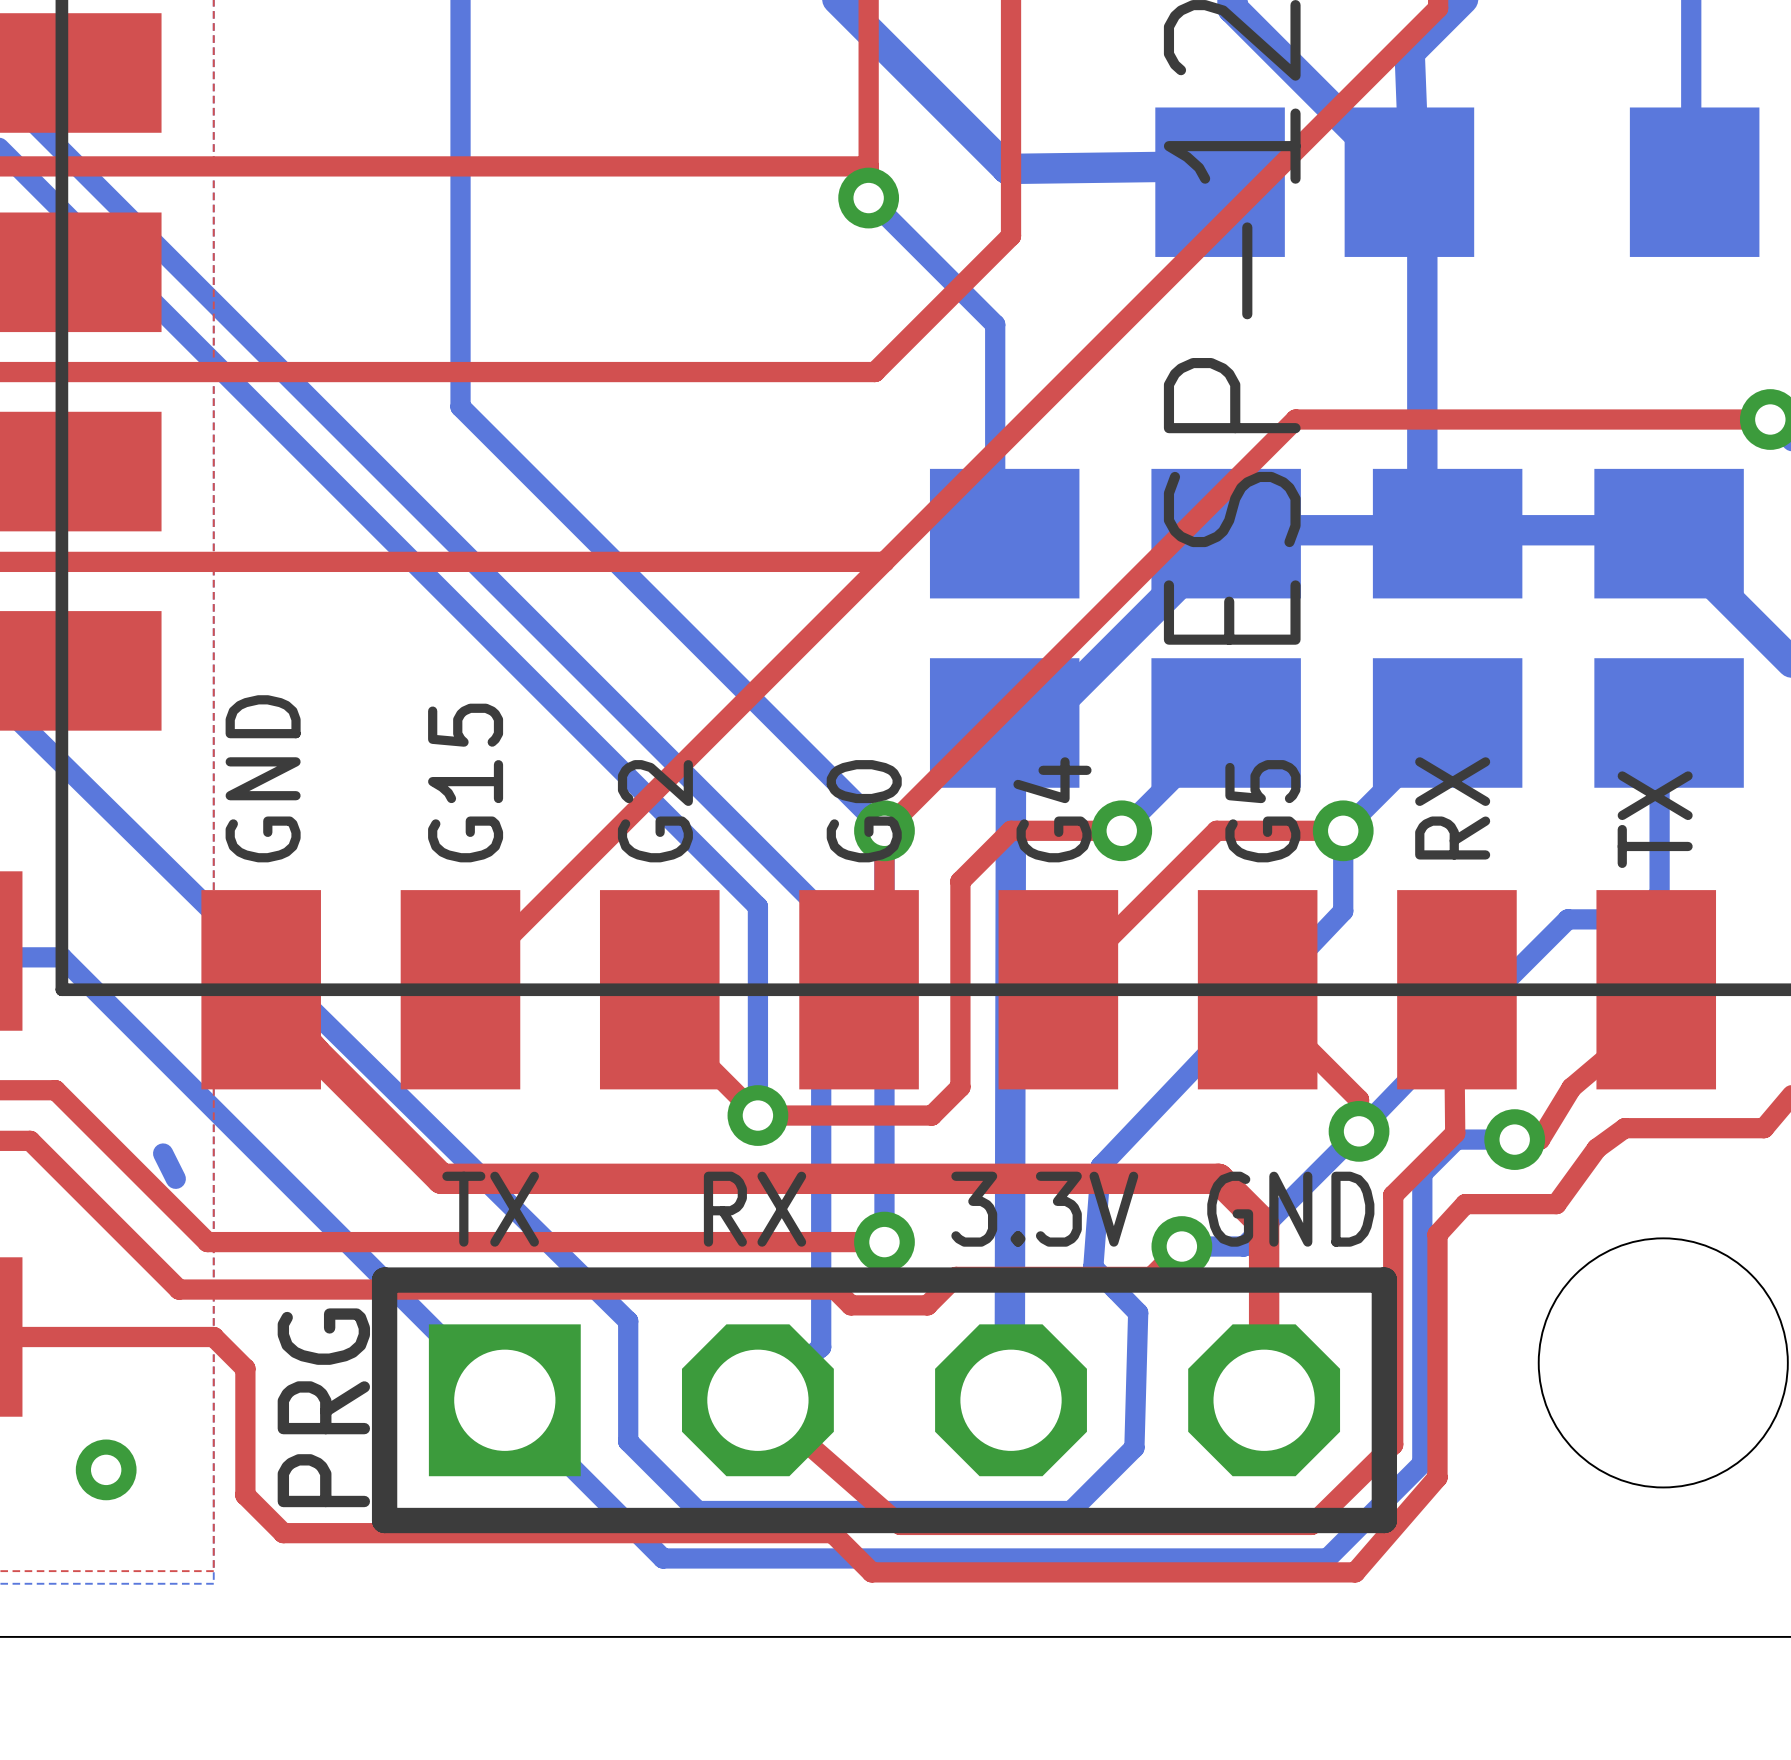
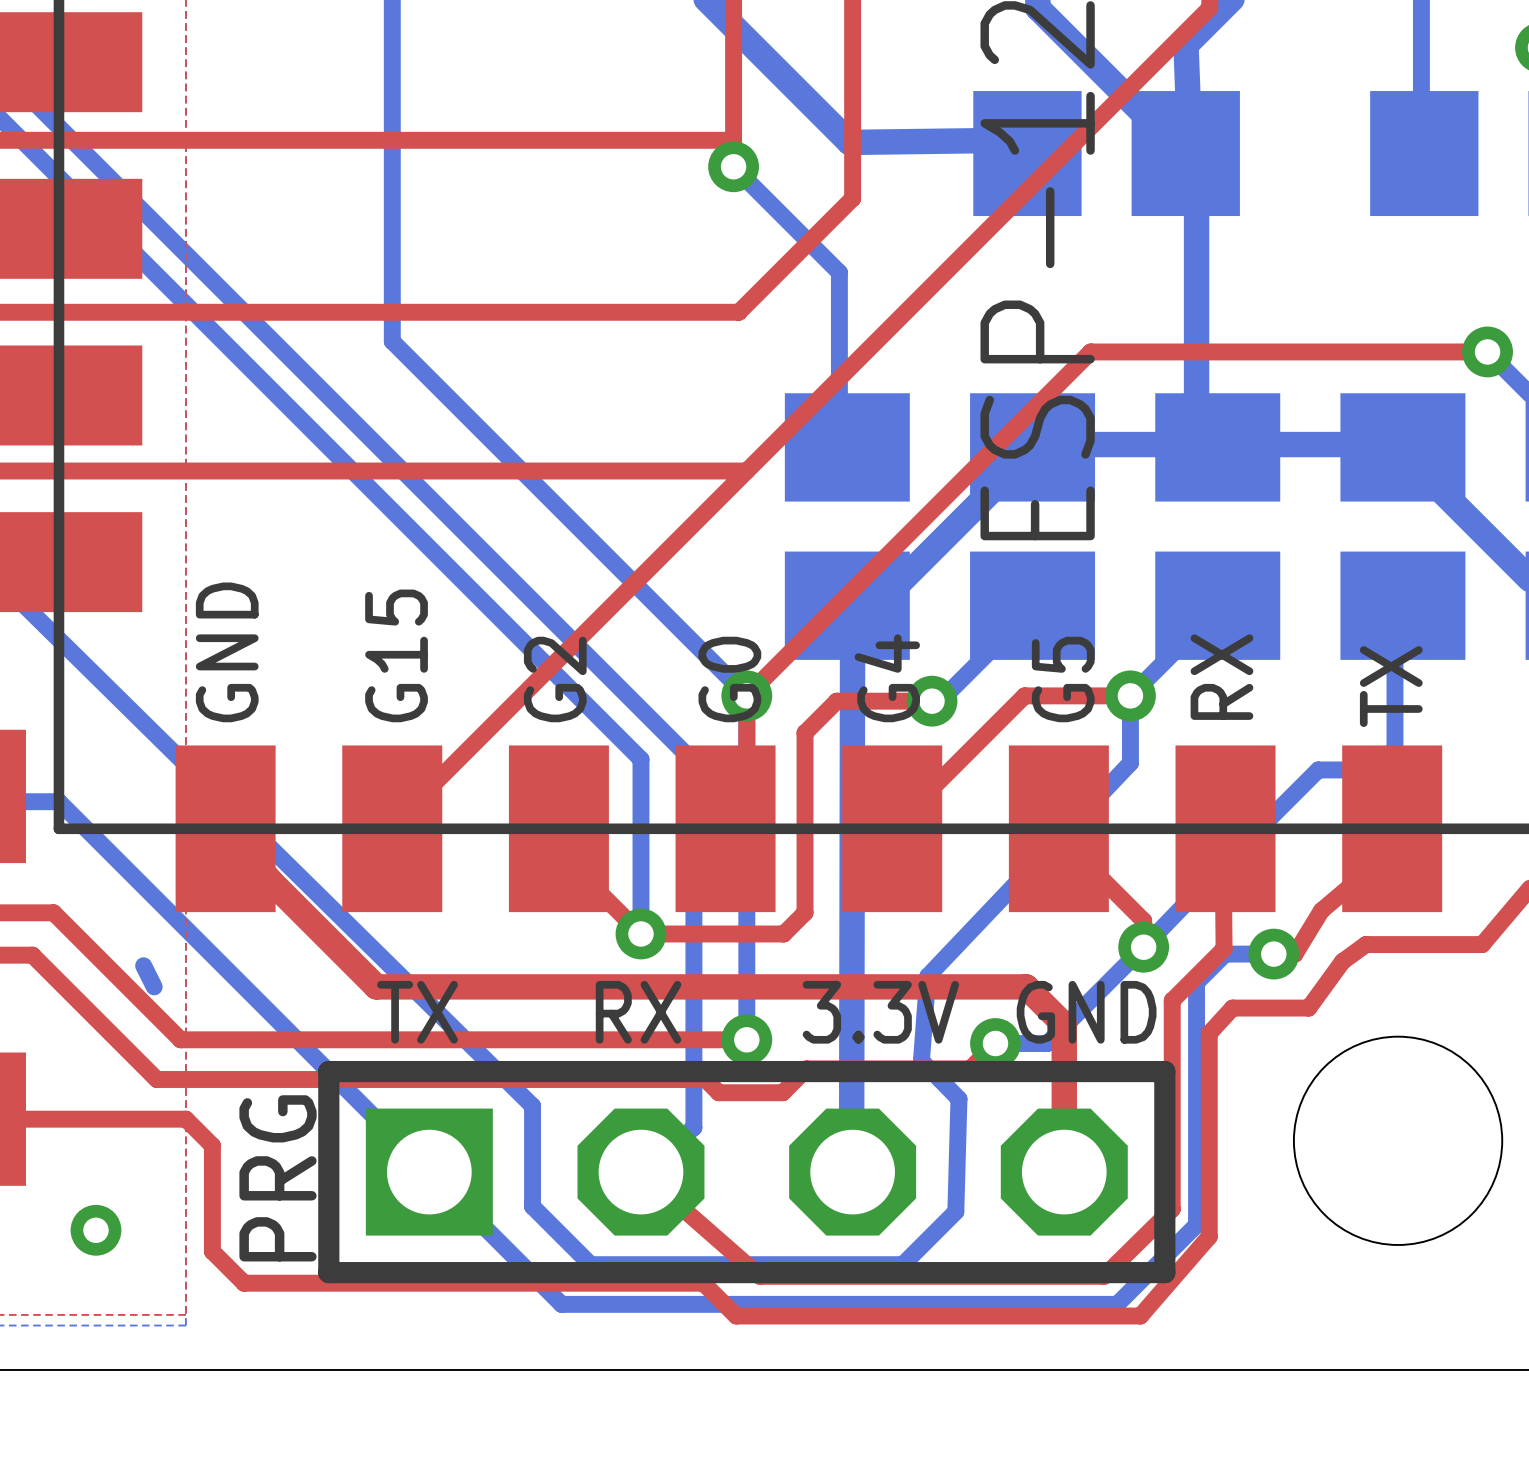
top track: (1121, 830) (1011, 830) (960, 881) (960, 1087) (931, 1115) (928, 1115) -> (932, 701) (836, 701) (805, 732) (805, 912) (783, 933)
via position: (1121, 830) -> (932, 701)

